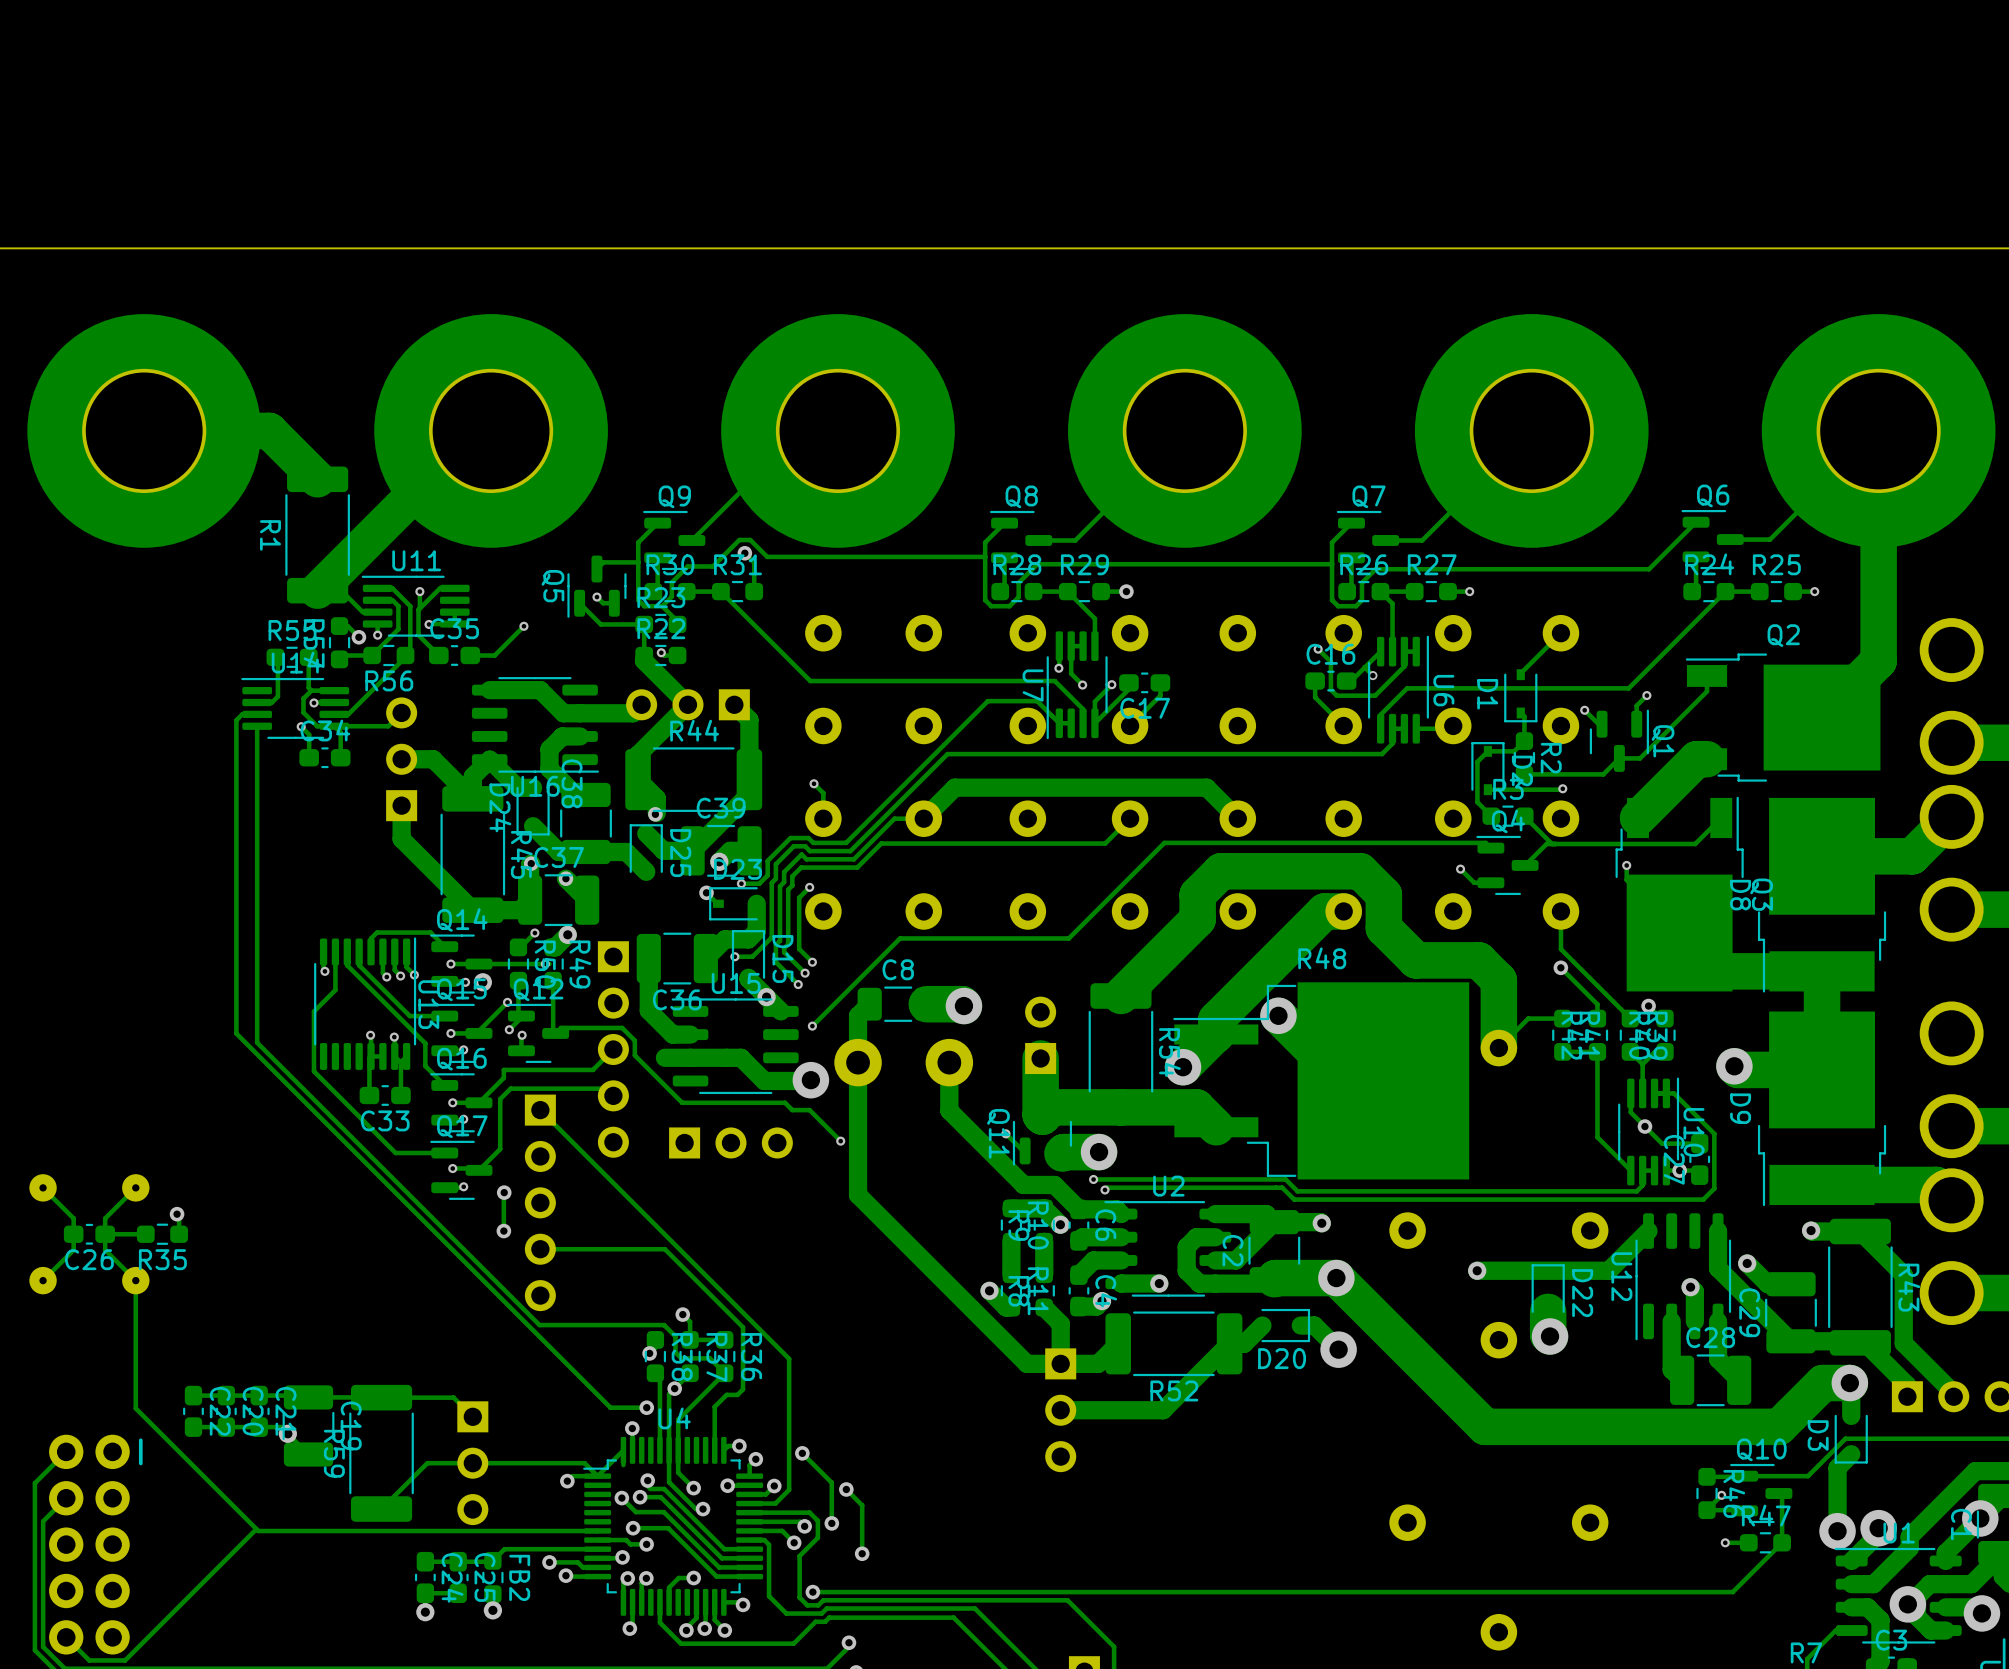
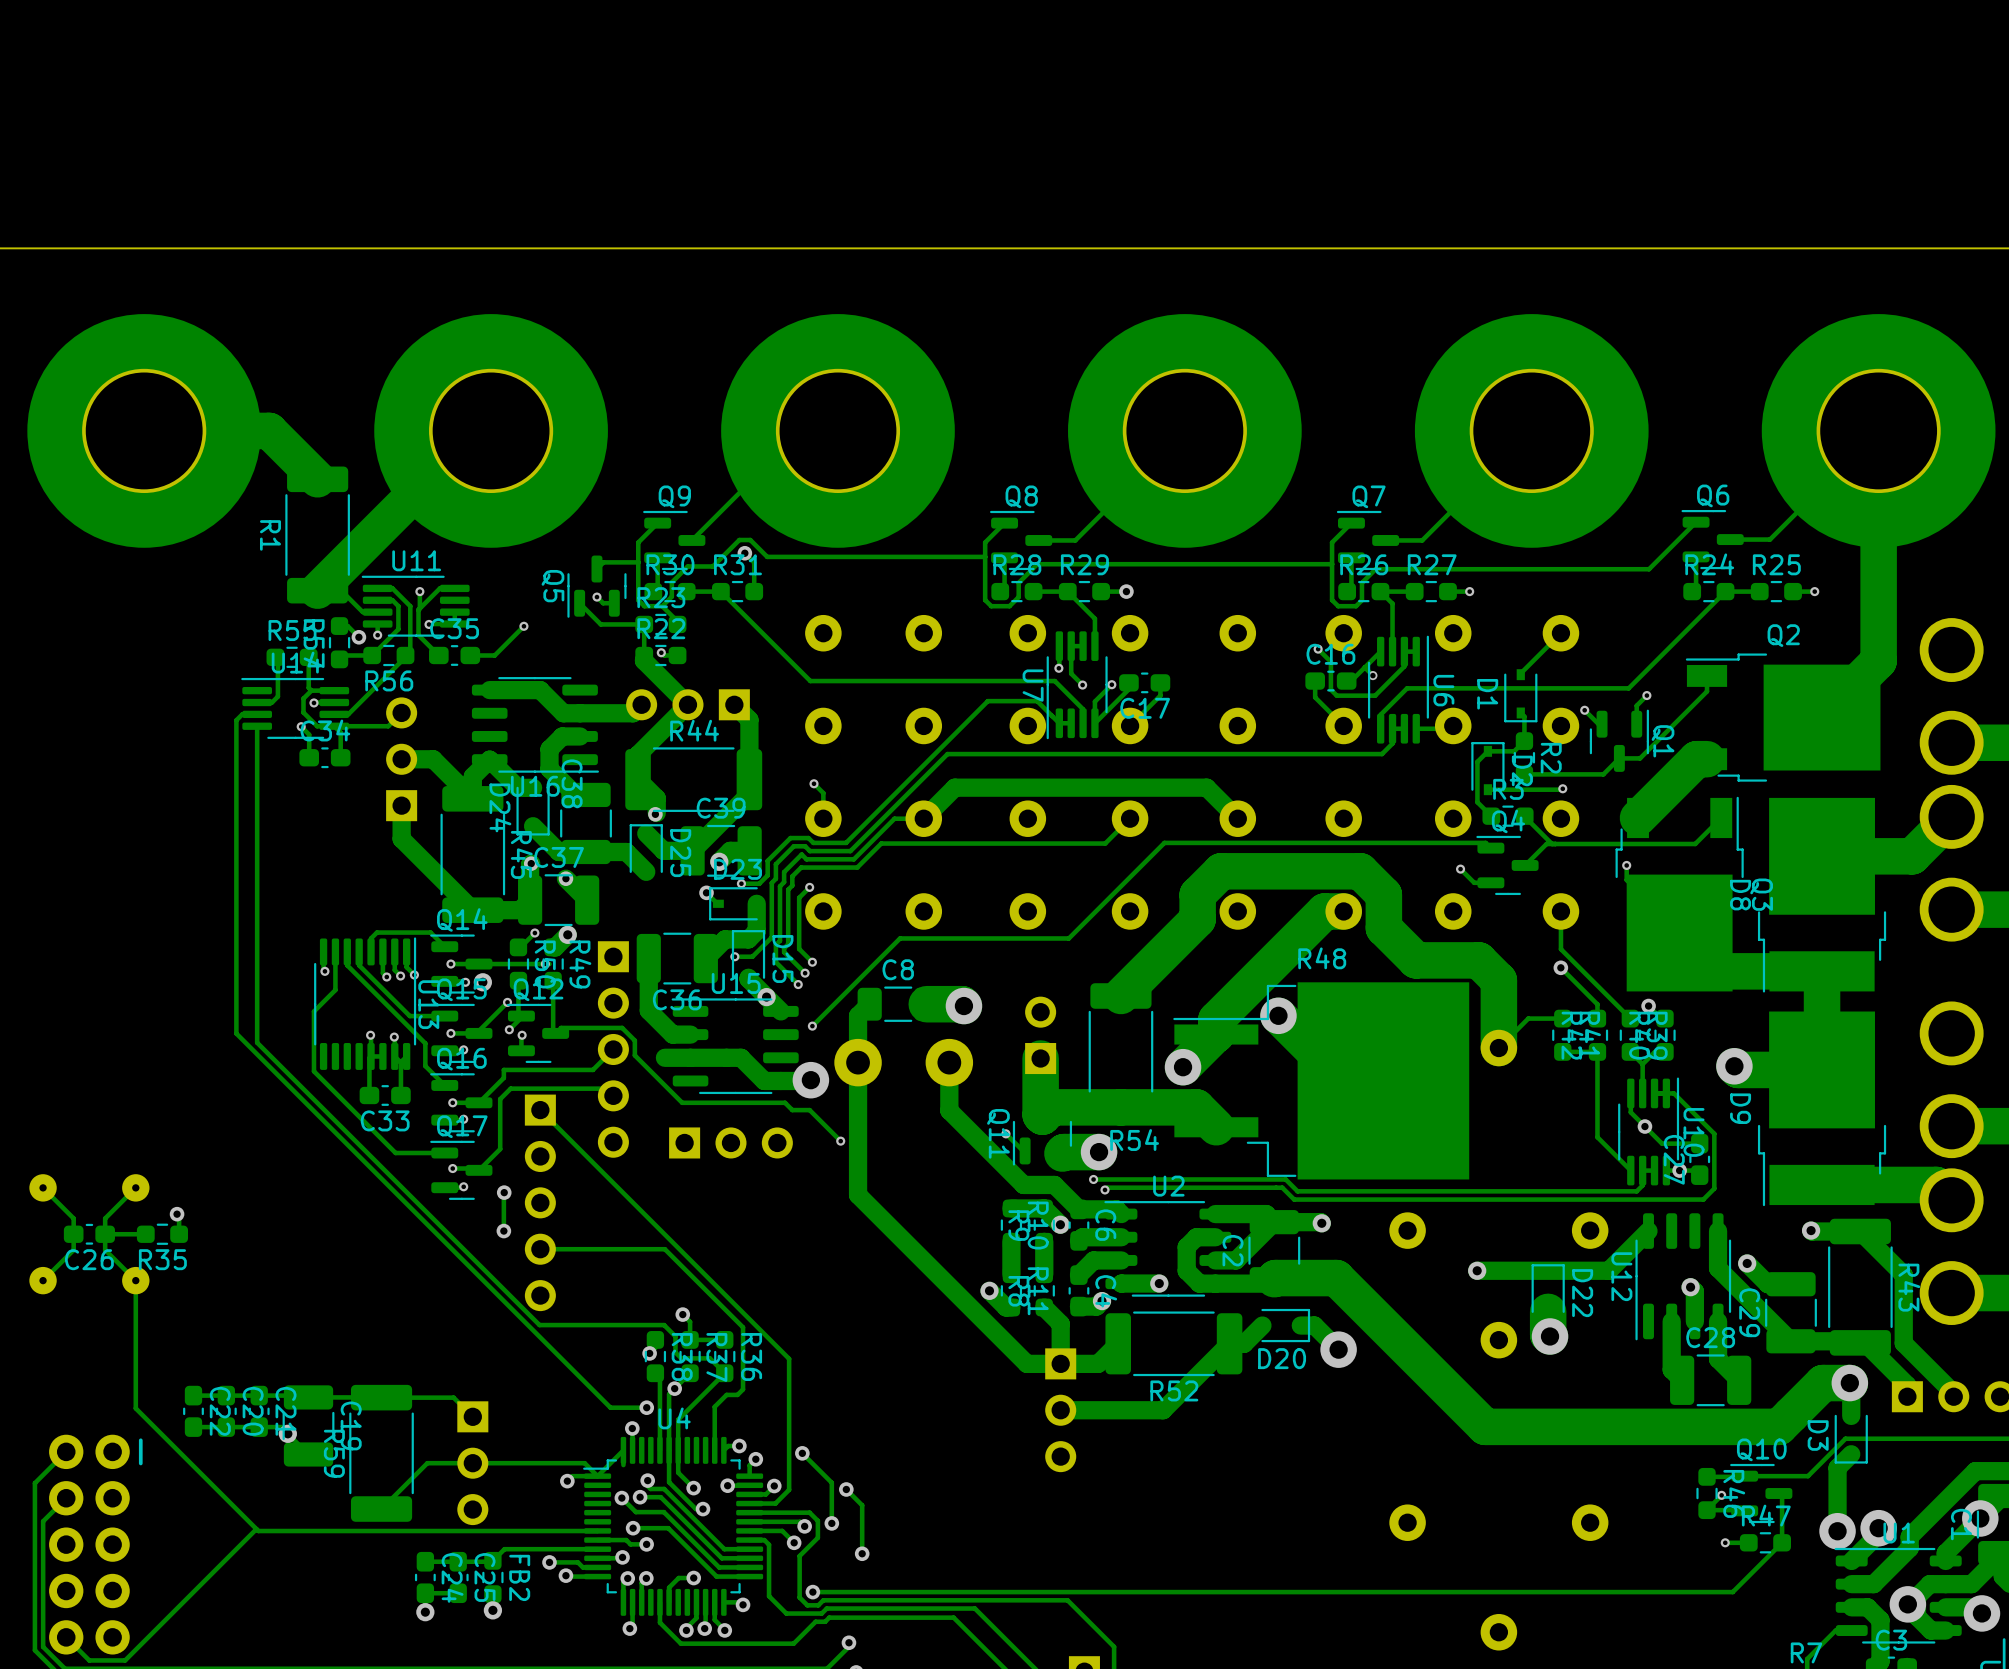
R54 name rotation: 0° (1169, 1052) -> 90° counterclockwise (1134, 1140)
R54 name position: R54 (1169, 1052) -> R54 (1134, 1140)
via: (1336, 1278) -> none

